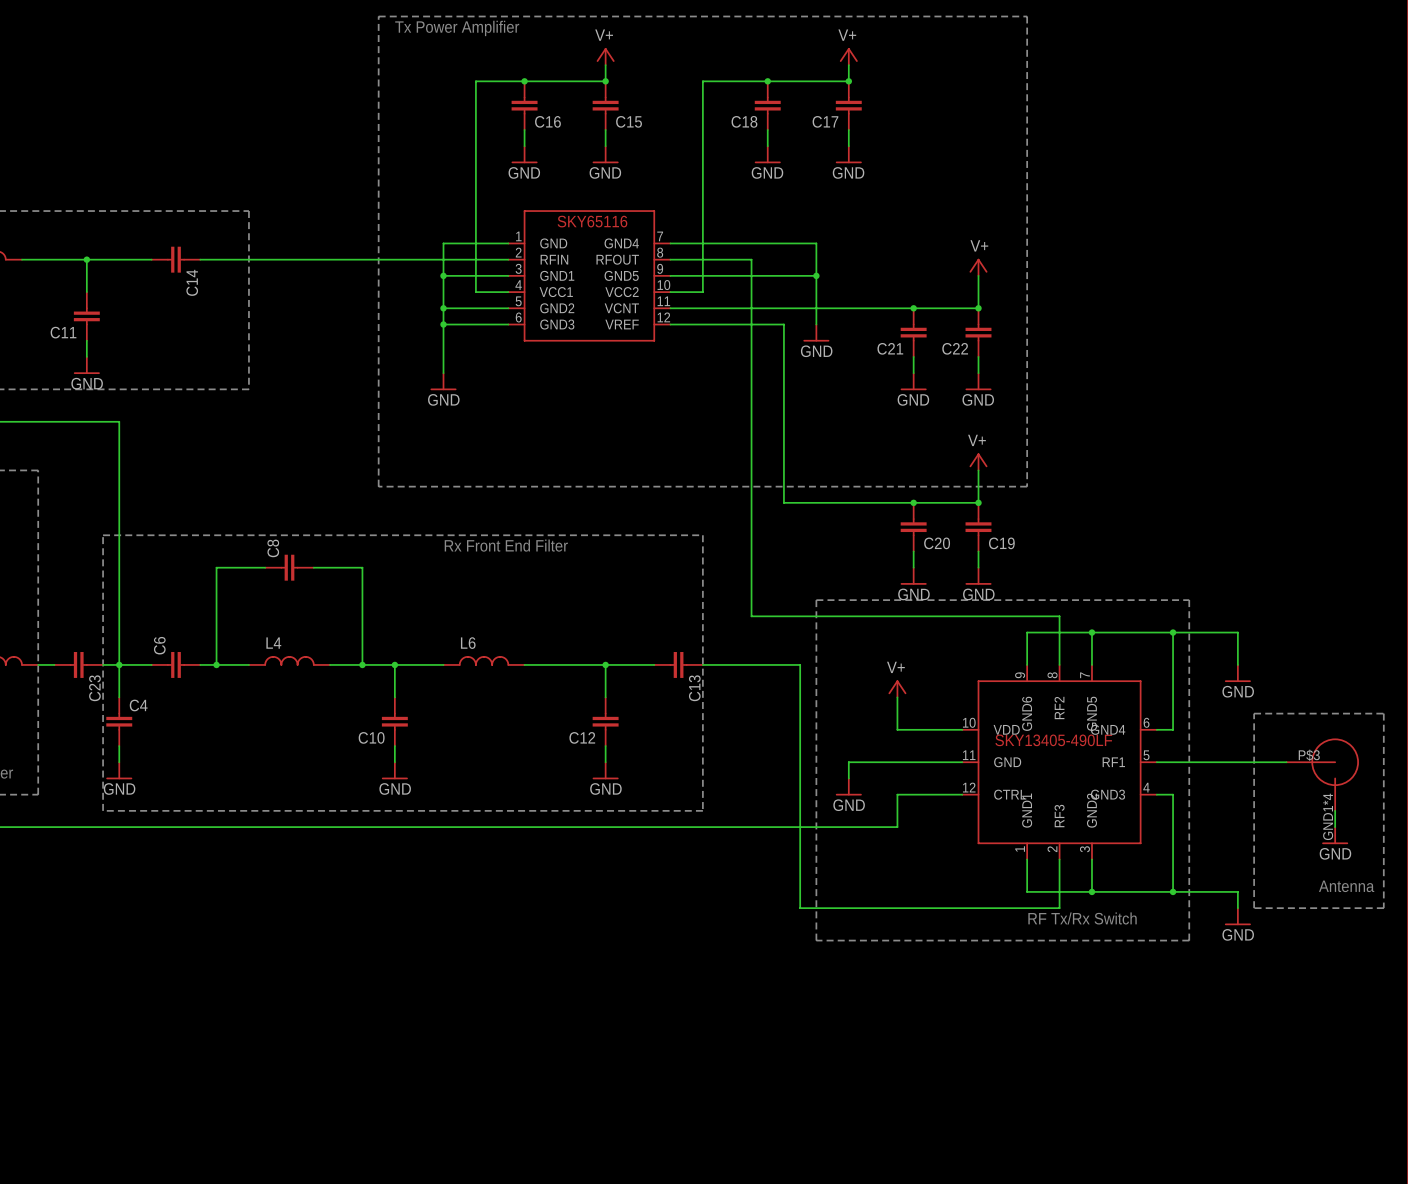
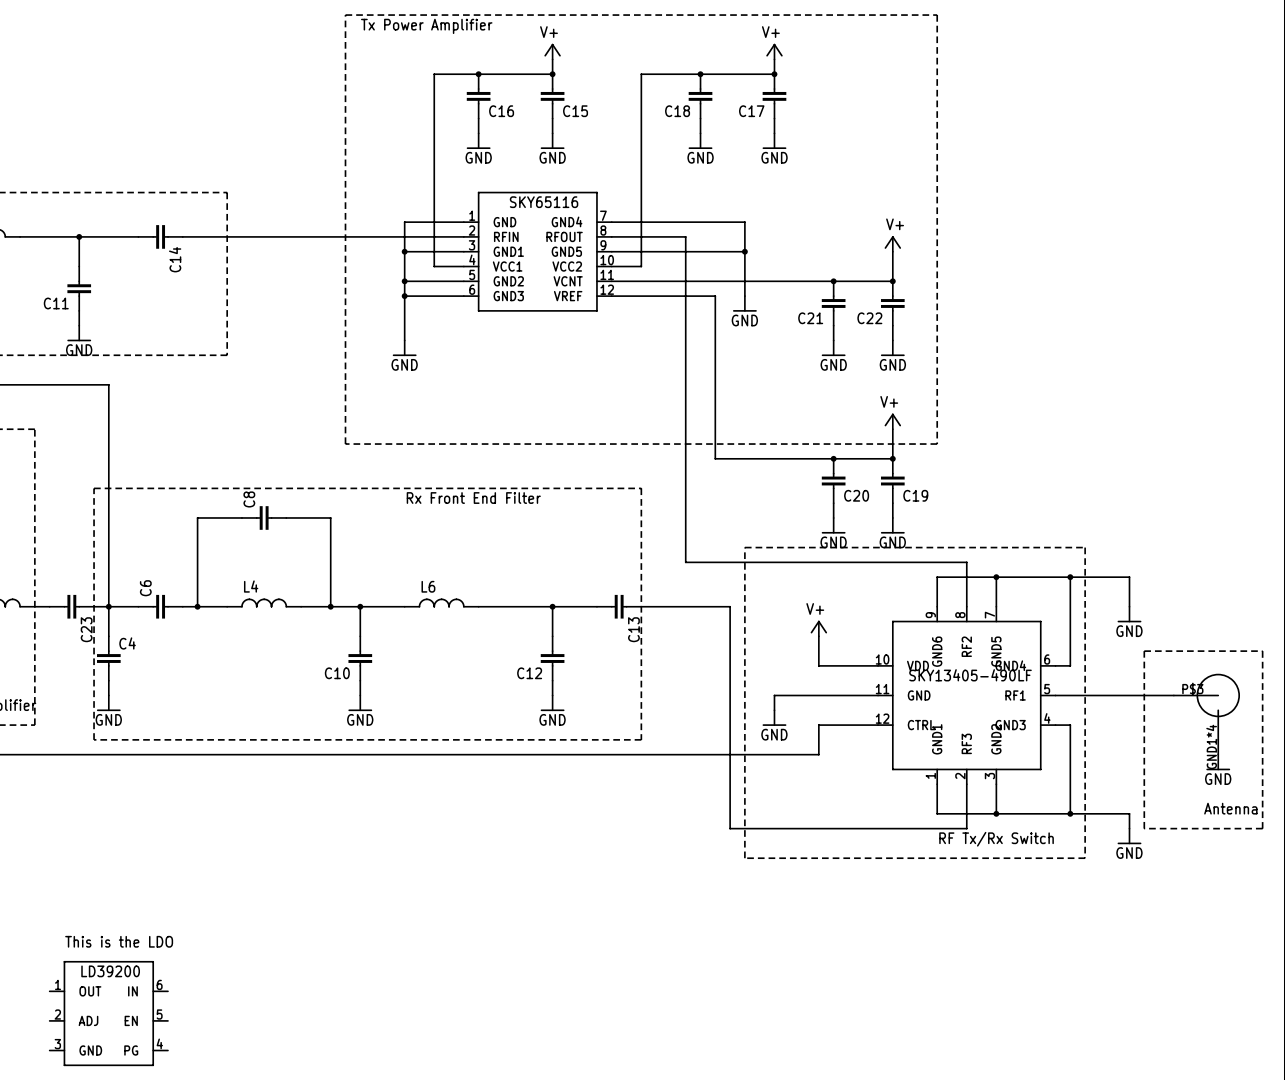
text: none -> This is the LDO (119, 941)
part: none -> (108, 1013)

